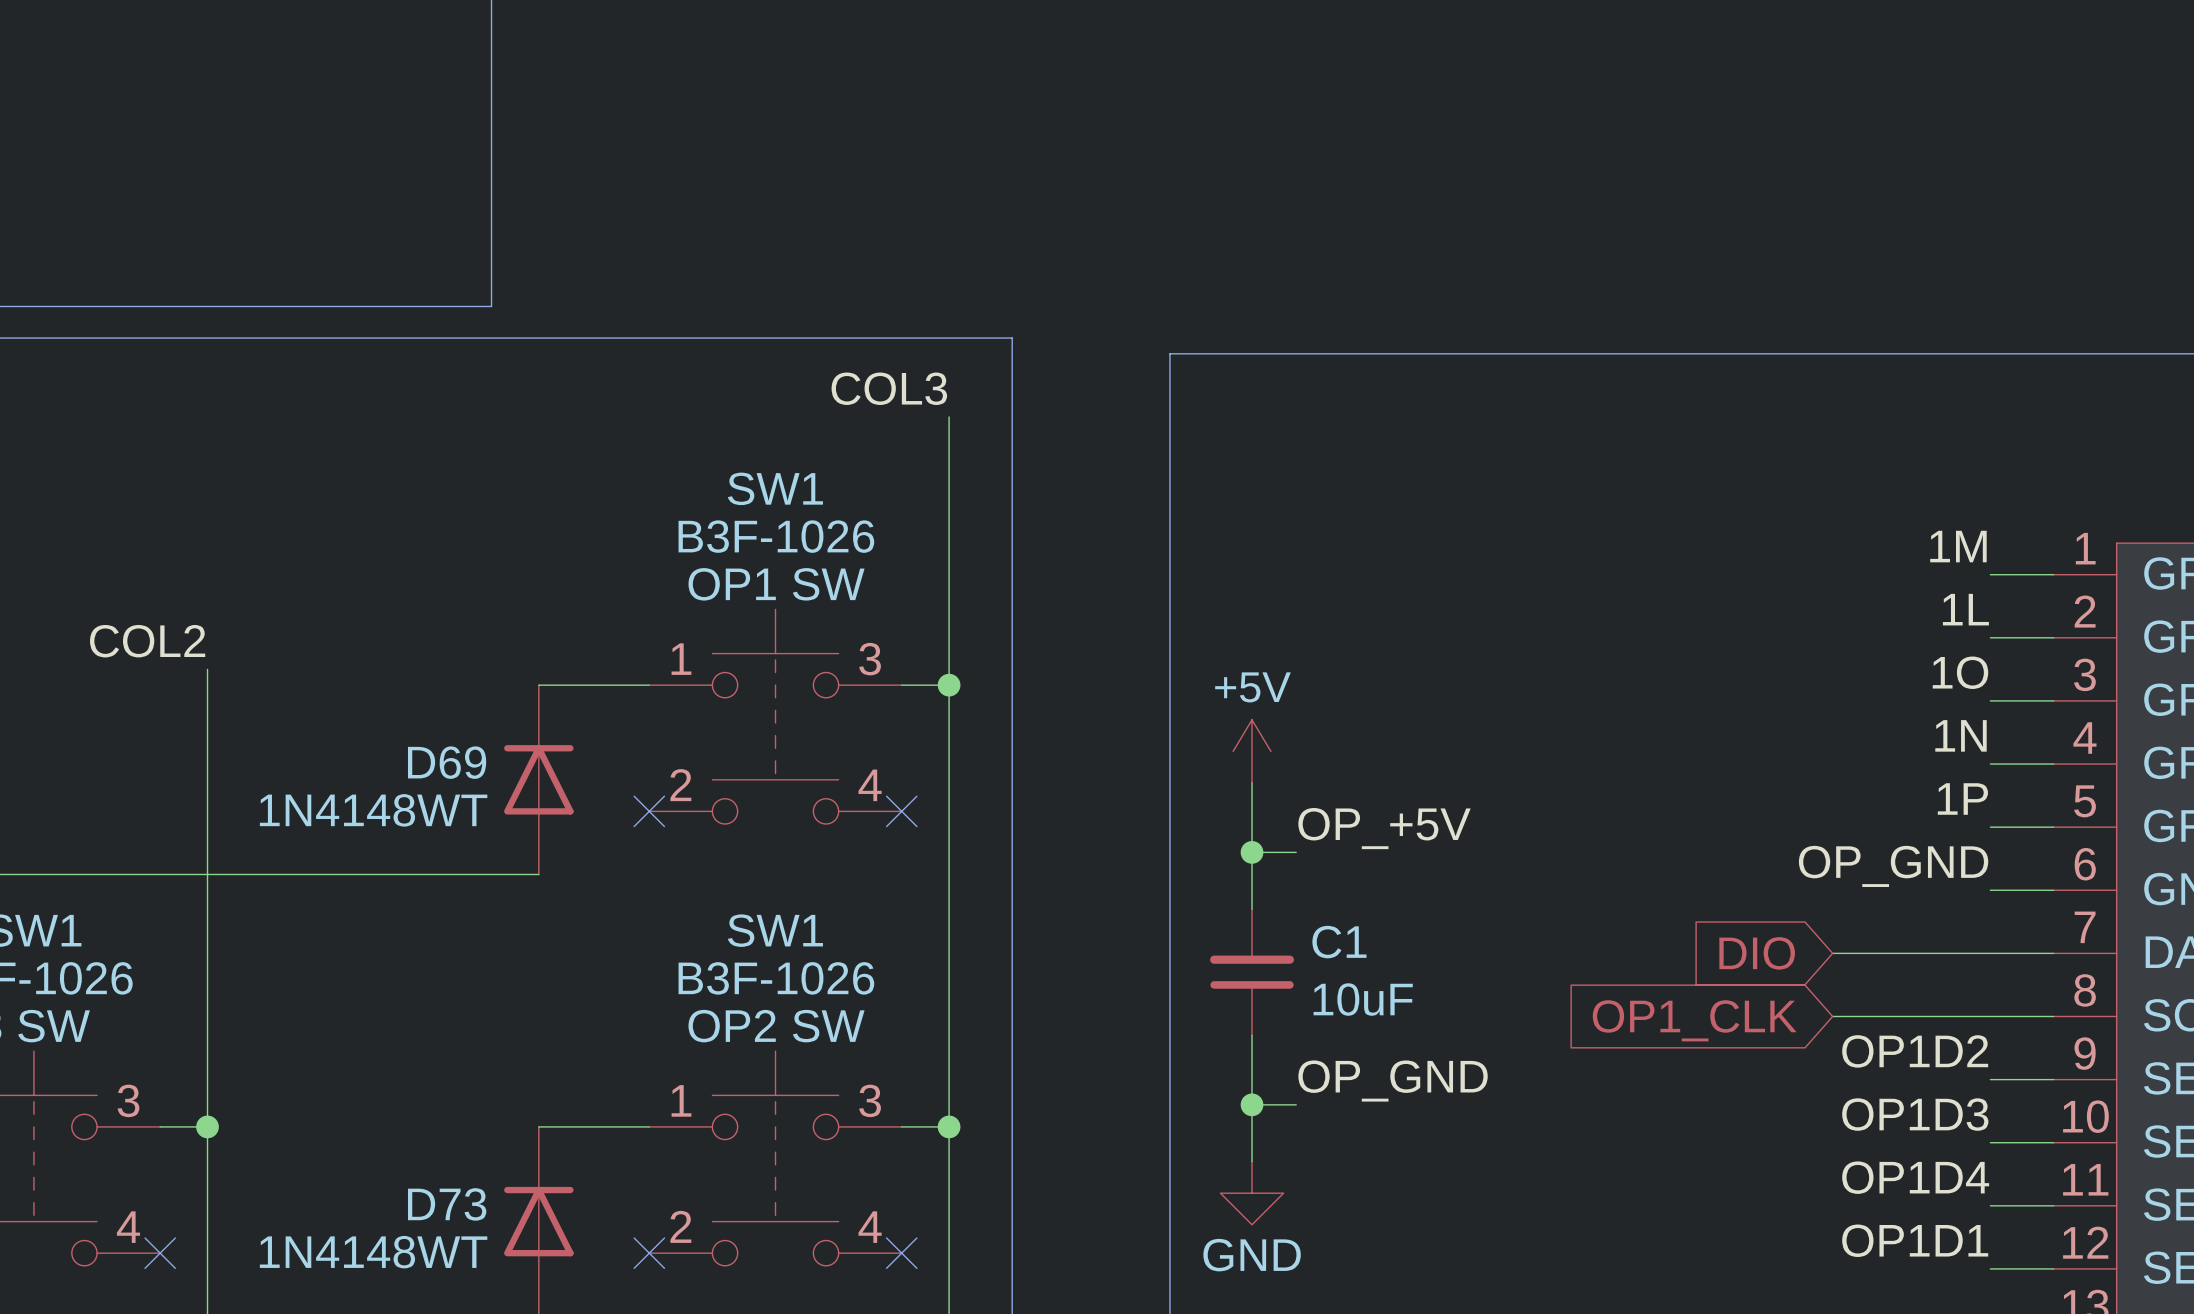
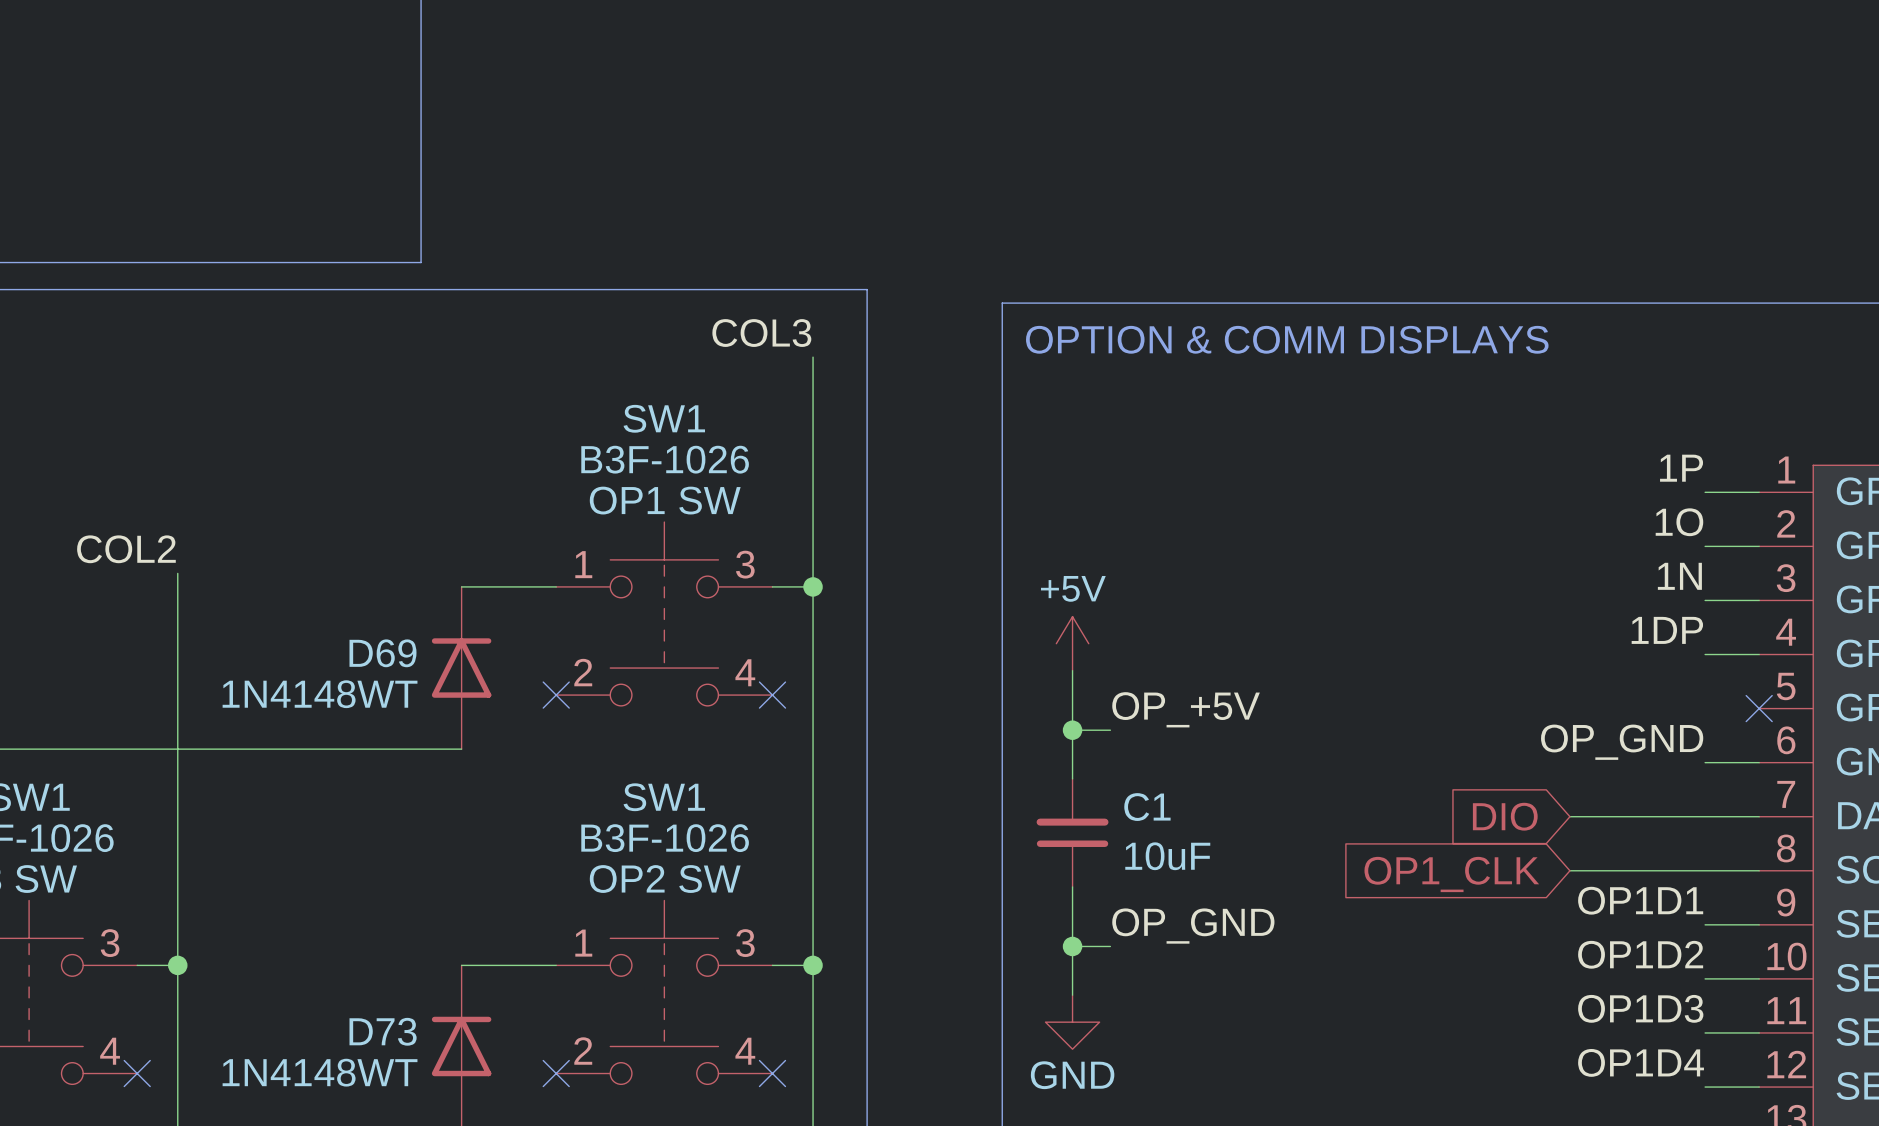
text: none -> OPTION & COMM DISPLAYS (1287, 339)
label: 1M (1958, 546) -> 1P (1681, 468)
label: 1L (1965, 609) -> 1O (1679, 522)
label: 1O (1960, 672) -> 1N (1679, 576)
label: 1N (1960, 735) -> 1DP (1667, 630)
label: 1P (1962, 798) -> none
wire: (1990, 827) (2053, 827) -> none
no-connect mark: none -> (1759, 708)
label: OP1D2 (1915, 1051) -> OP1D1 (1640, 900)
label: OP1D3 (1915, 1114) -> OP1D2 (1640, 954)
label: OP1D4 (1915, 1177) -> OP1D3 (1640, 1008)
label: OP1D1 (1915, 1240) -> OP1D4 (1641, 1062)

